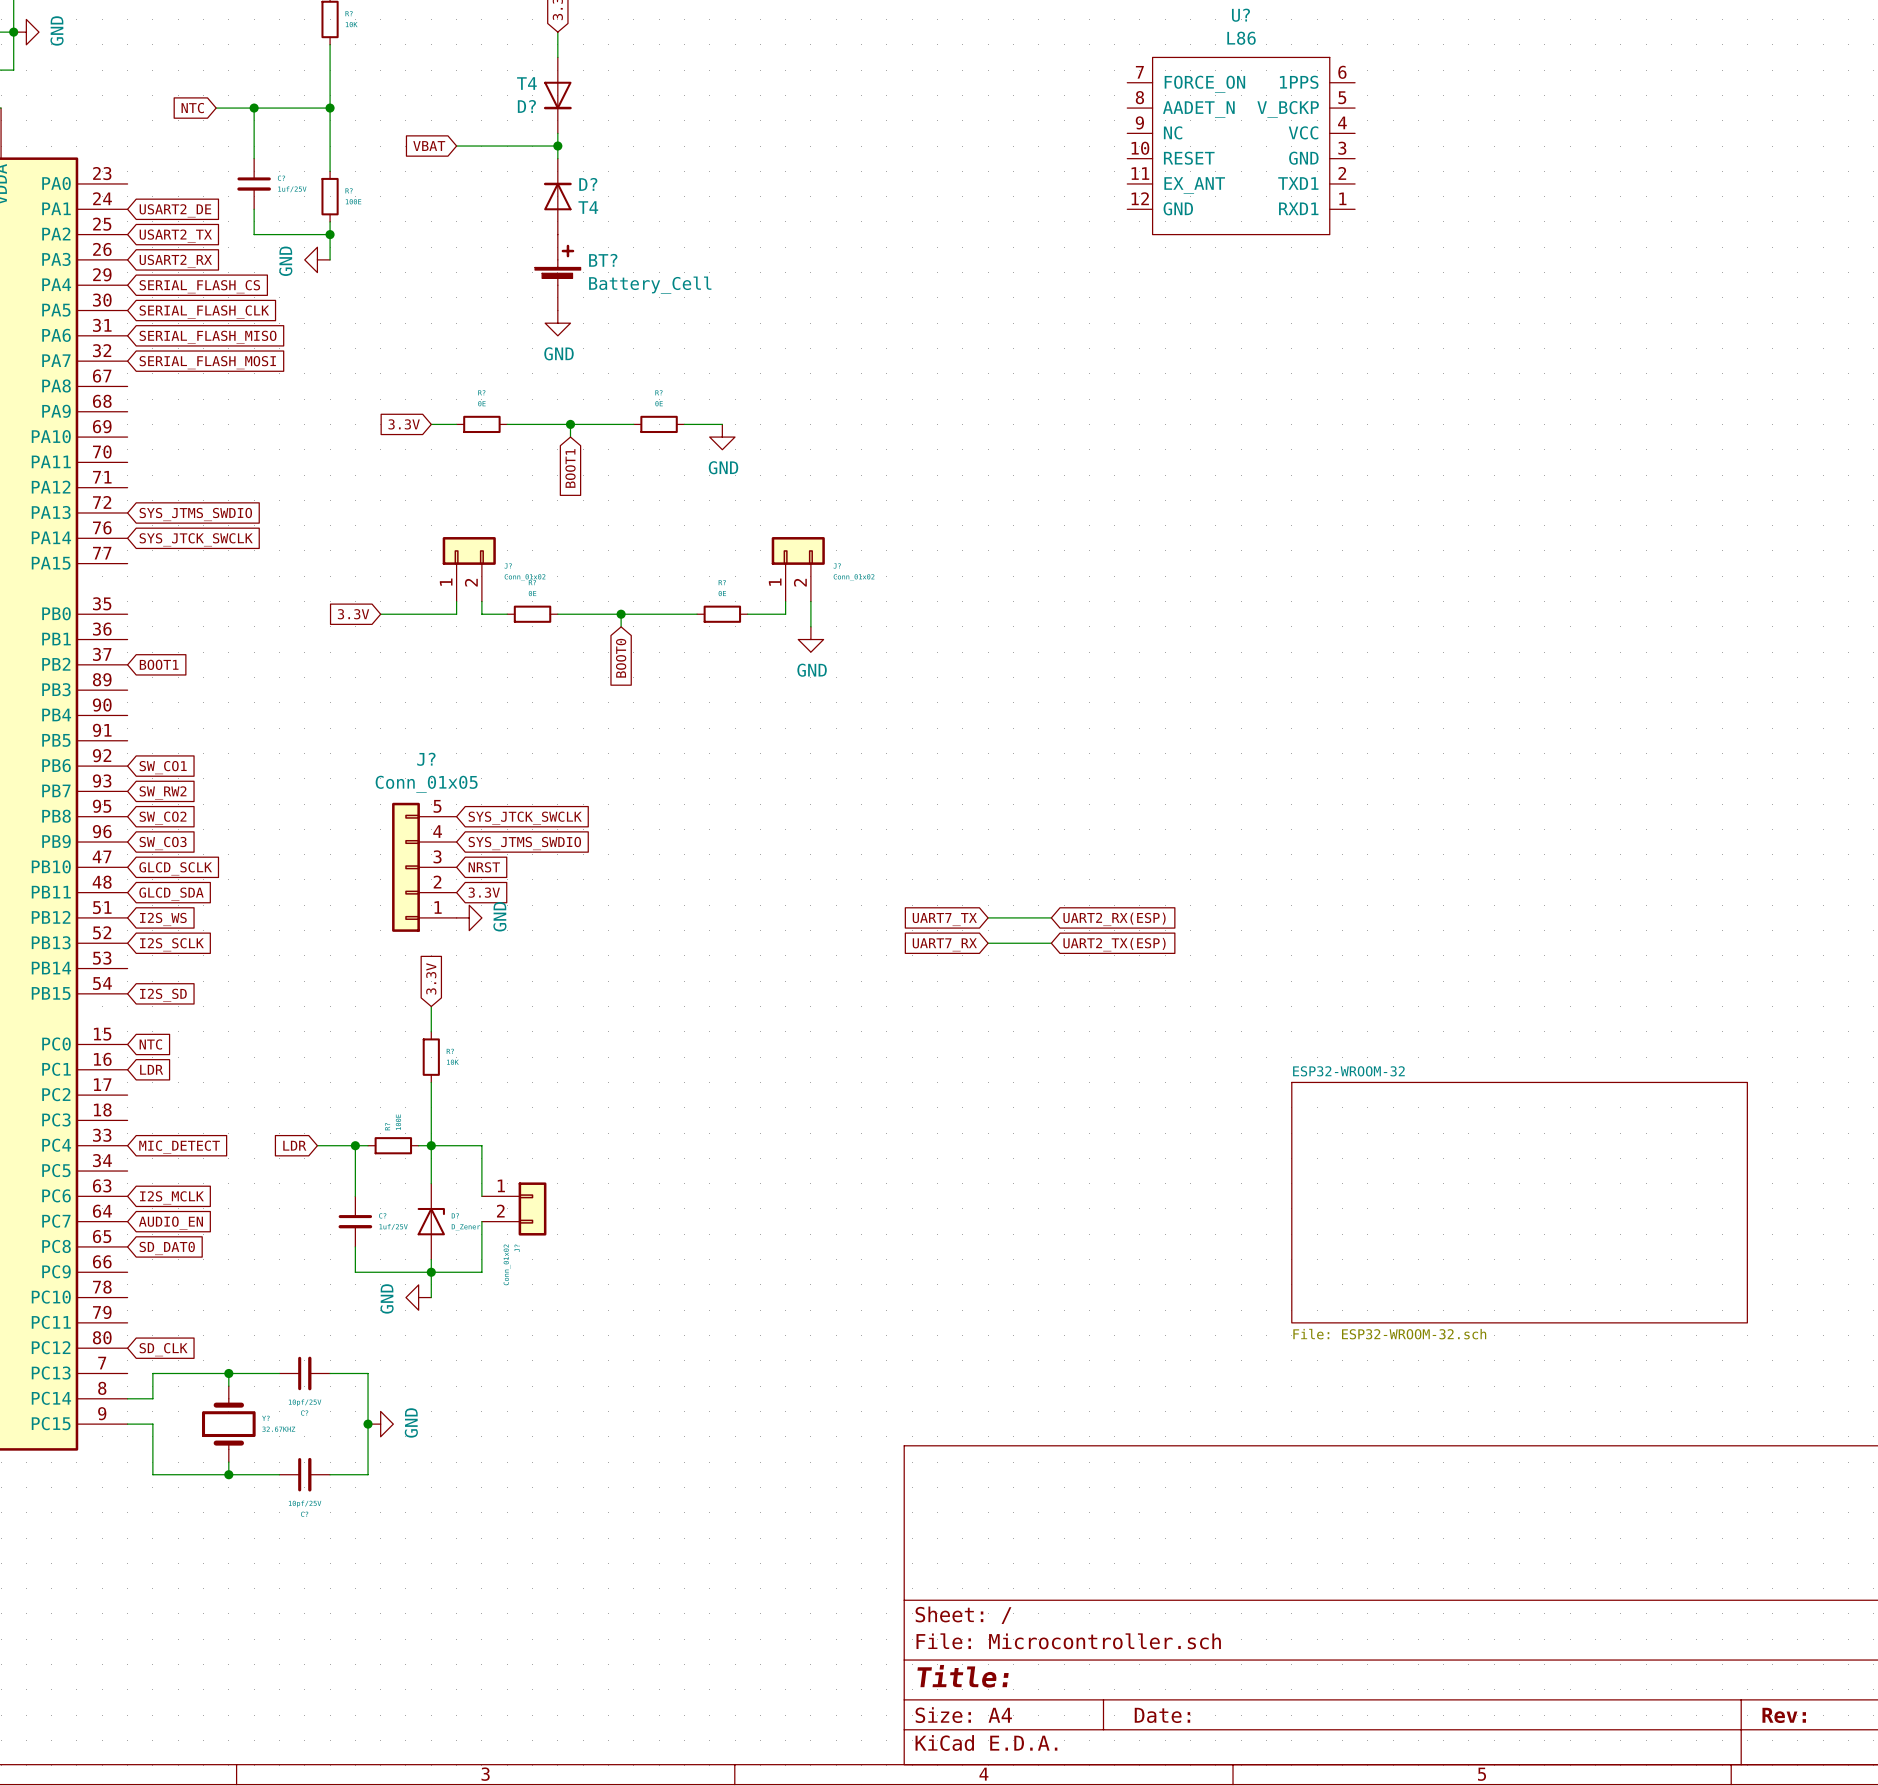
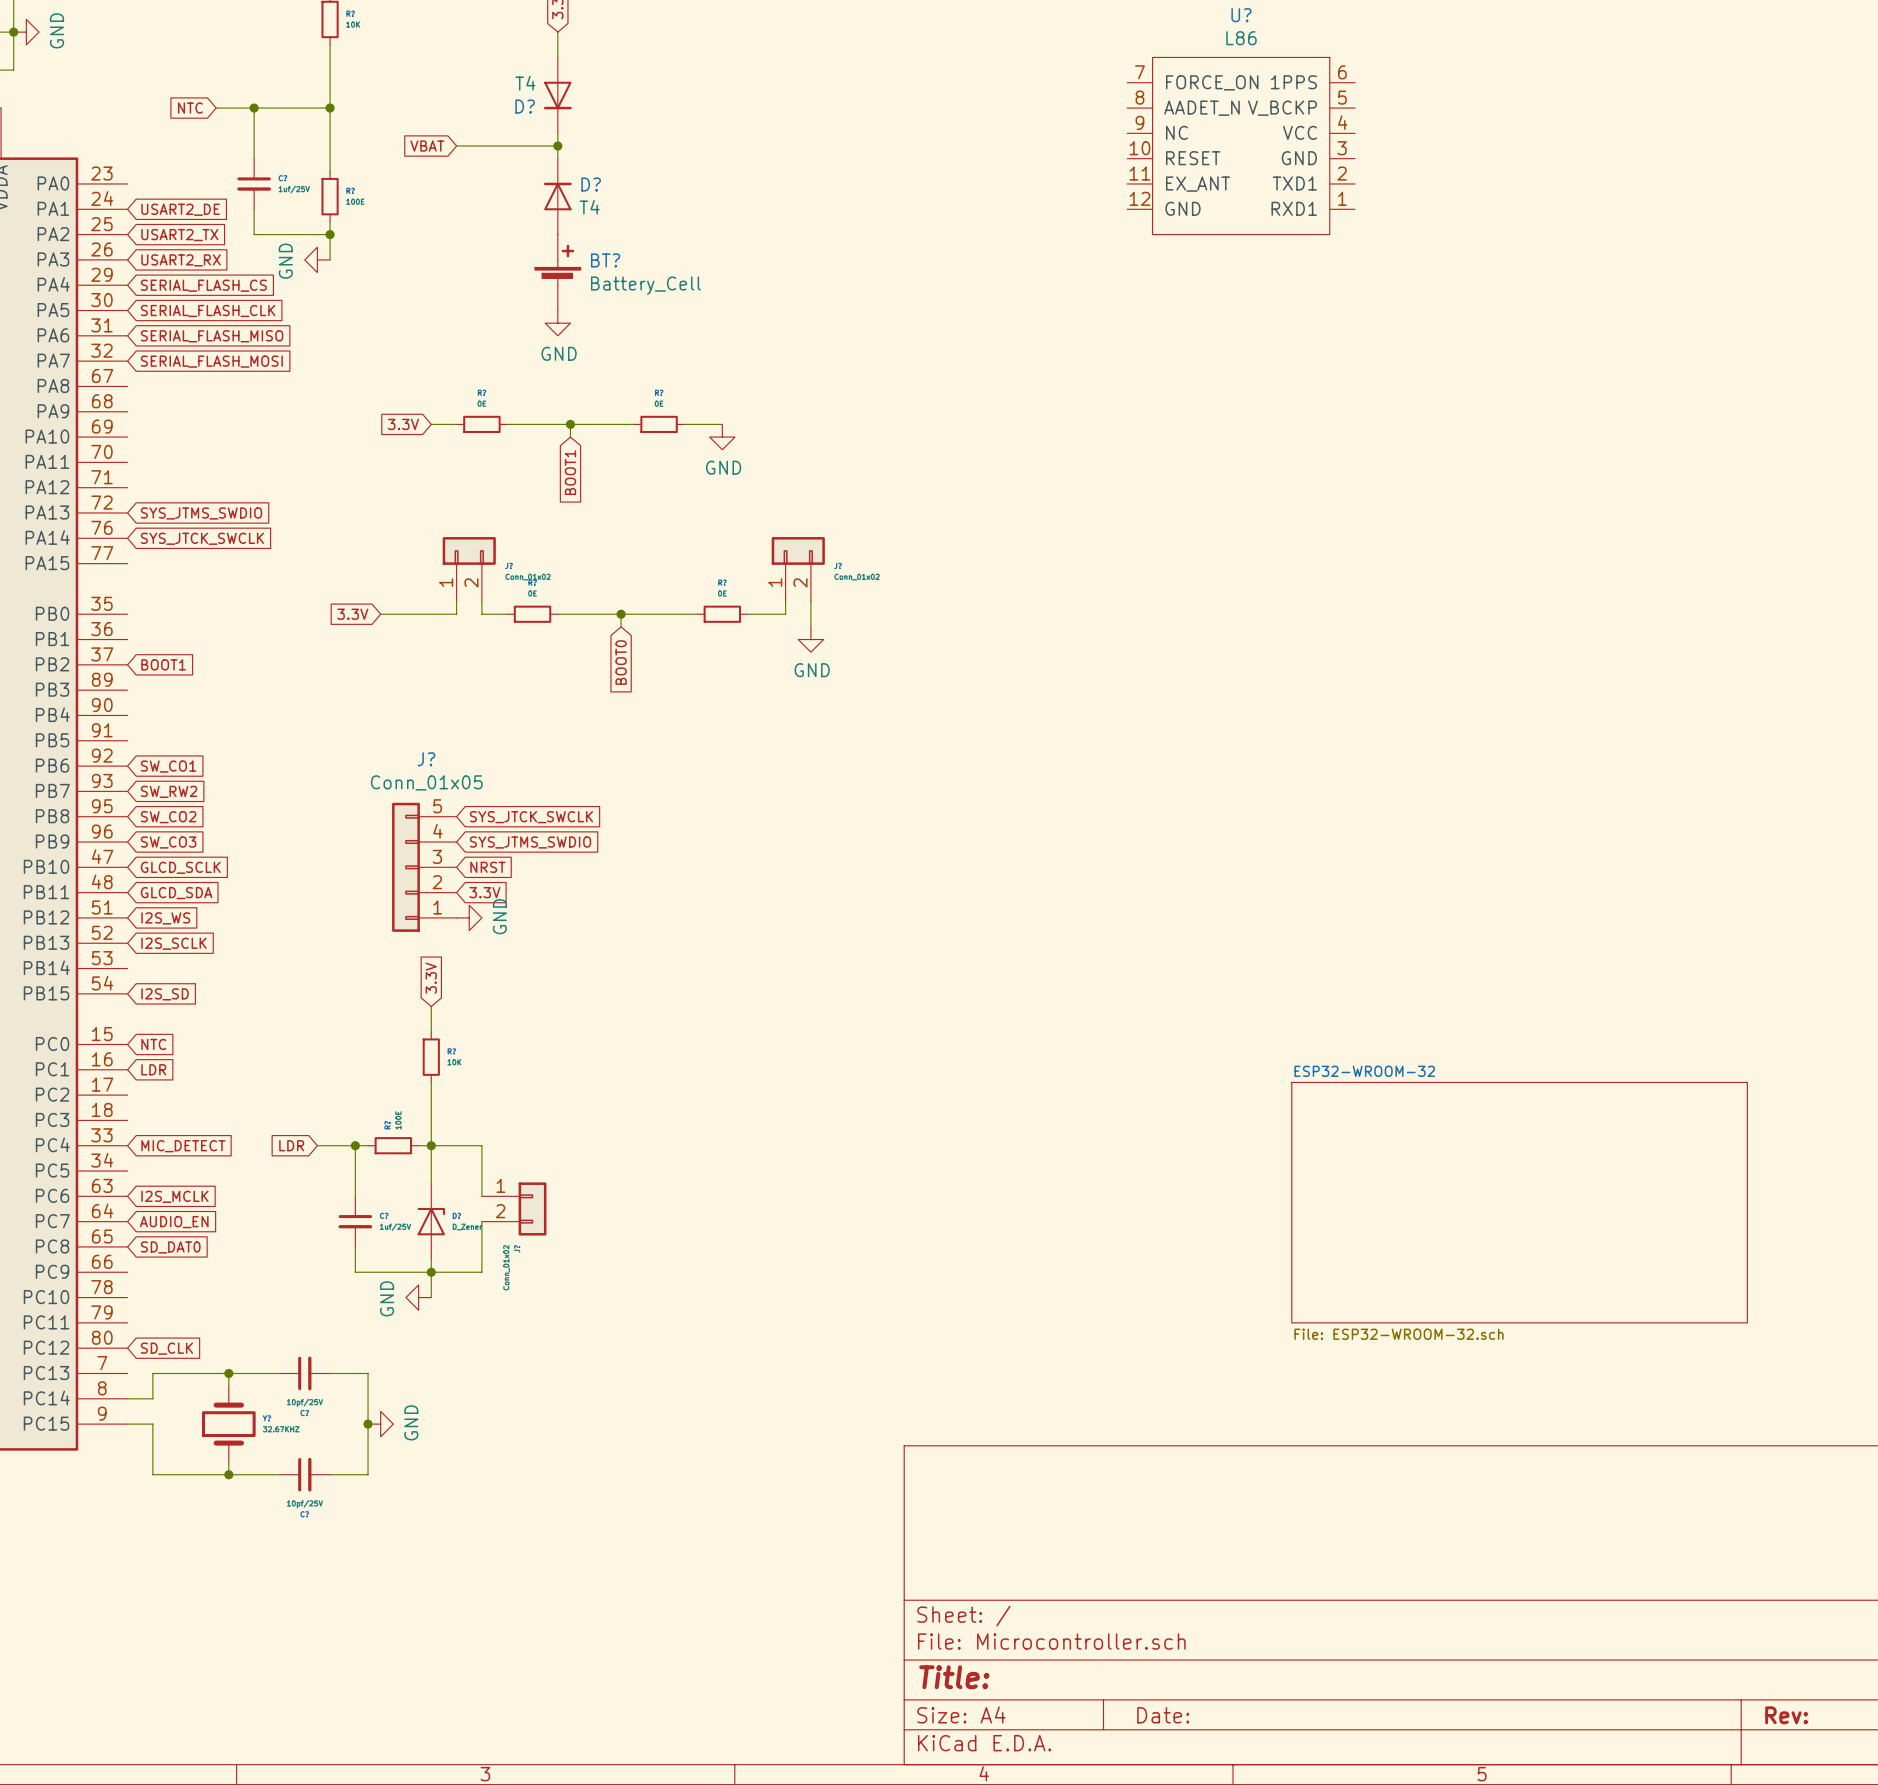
wire: (988, 917) (1051, 917) -> none
global label: UART7_TX (944, 919) -> none
global label: UART2_RX(ESP) (1114, 919) -> none
wire: (988, 943) (1051, 943) -> none
global label: UART7_RX (944, 944) -> none
global label: UART2_TX(ESP) (1114, 944) -> none

